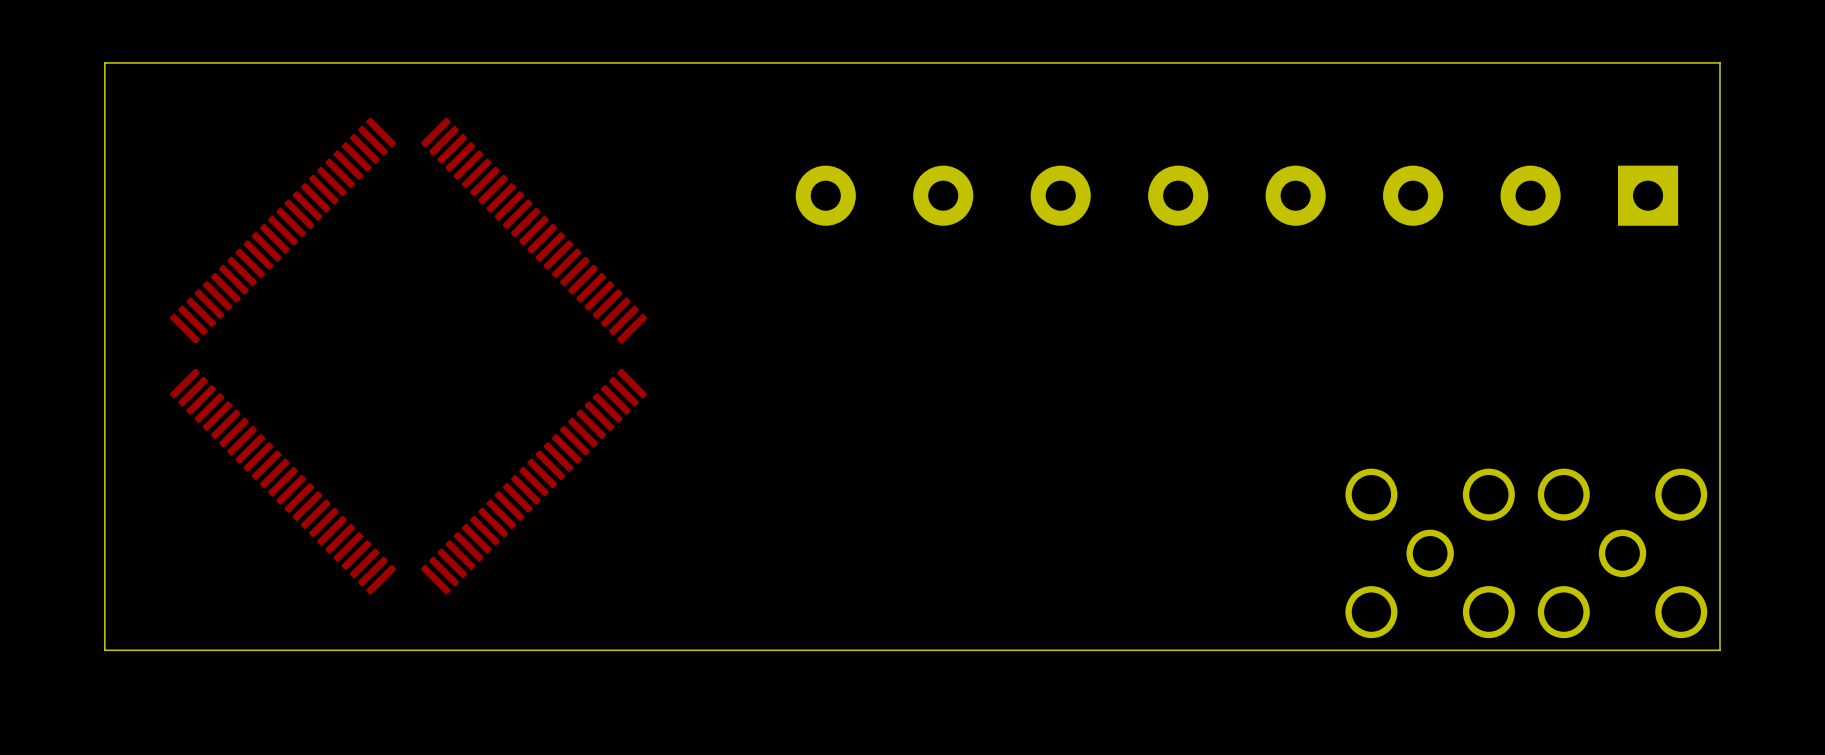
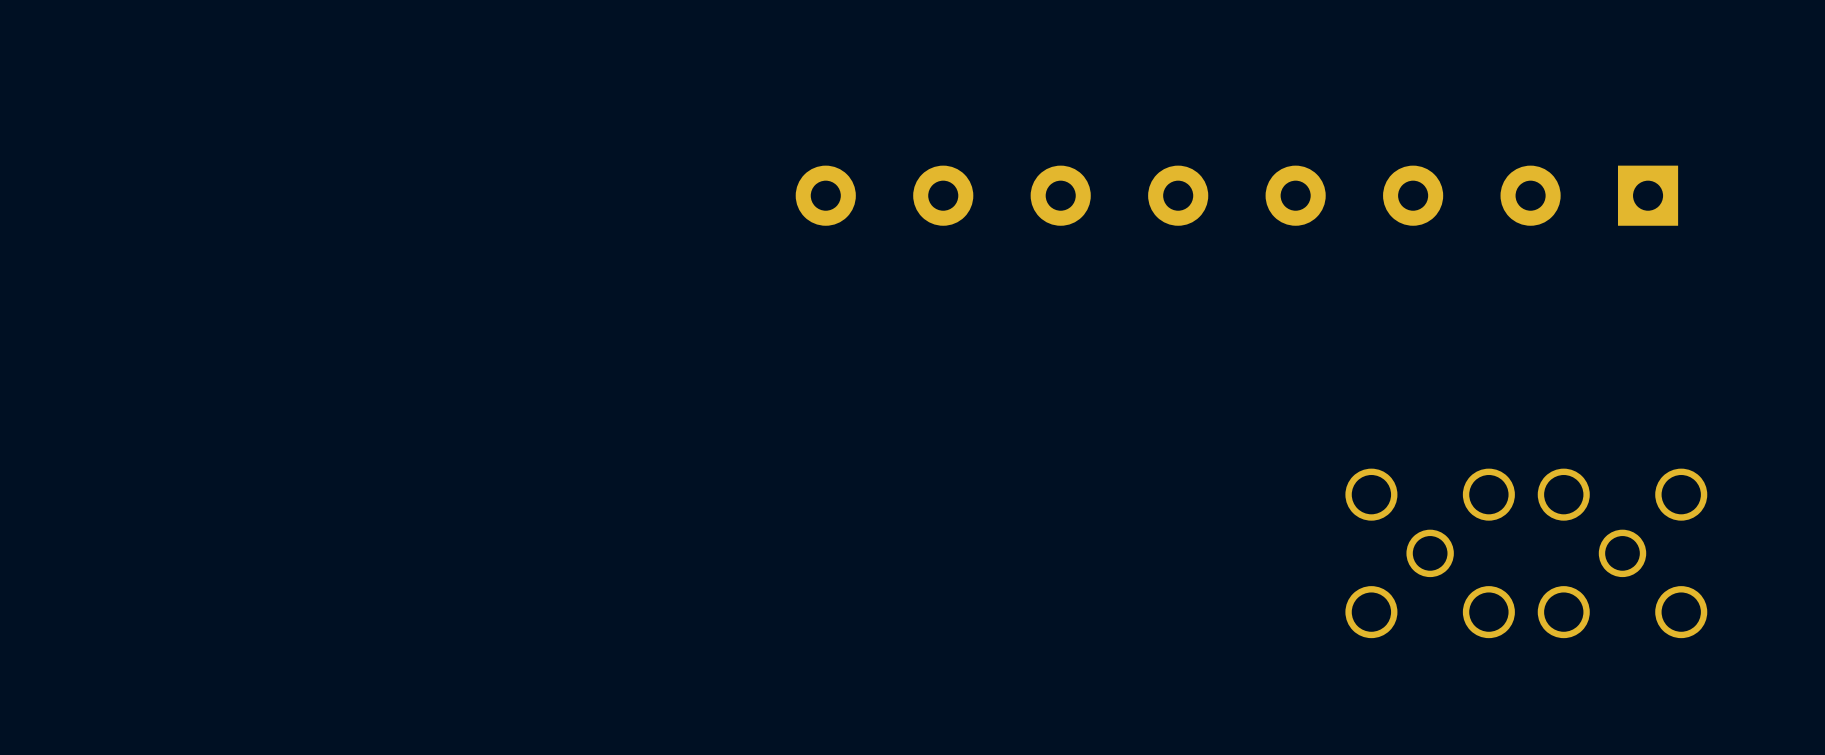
board edge: (1720, 62) (1720, 650) (104, 650) (104, 62) (1720, 62) -> none
part: (408, 356) -> none

